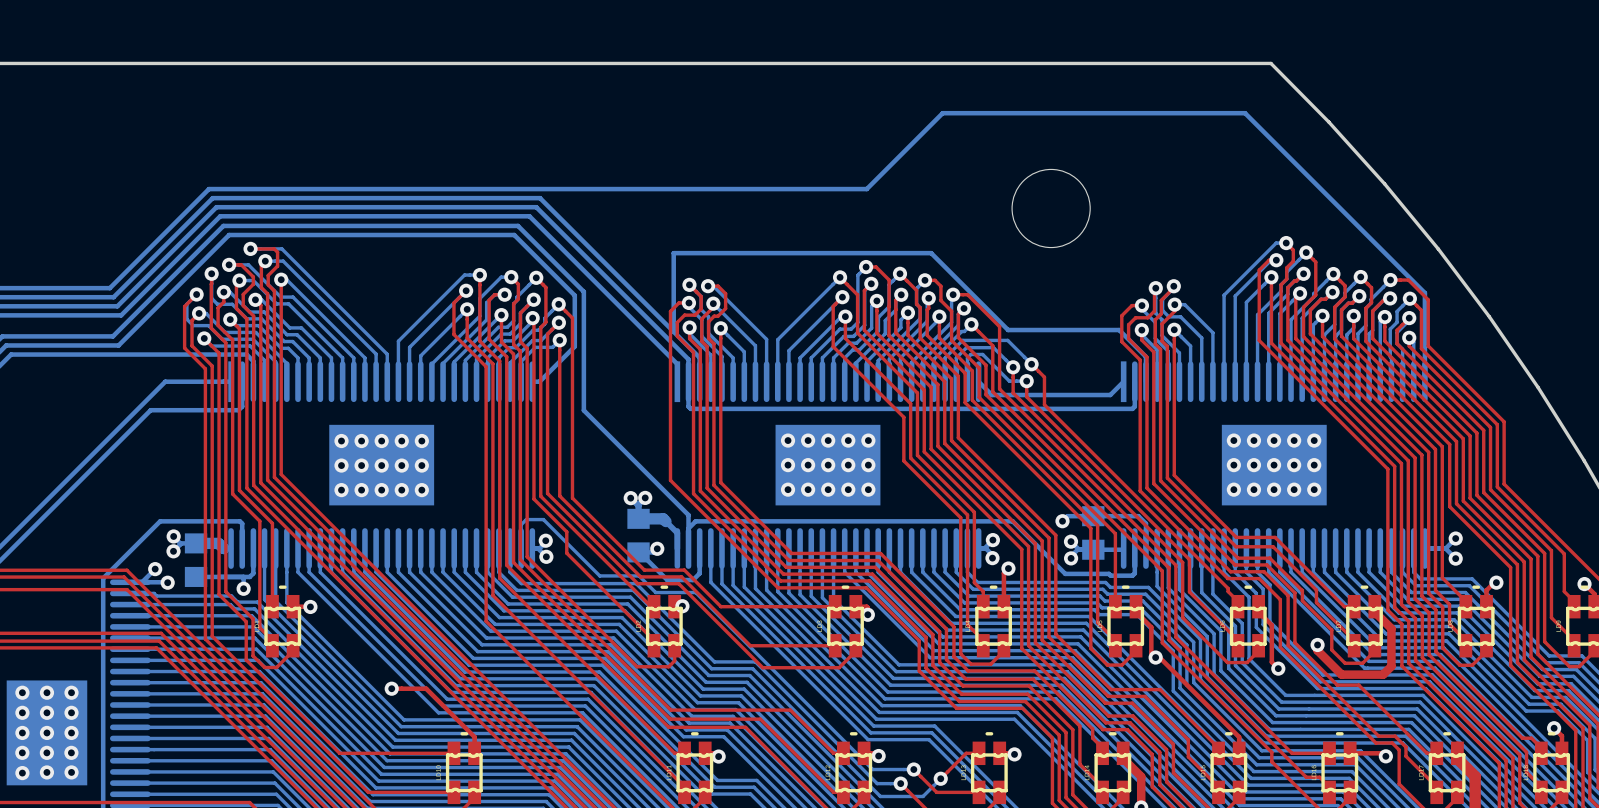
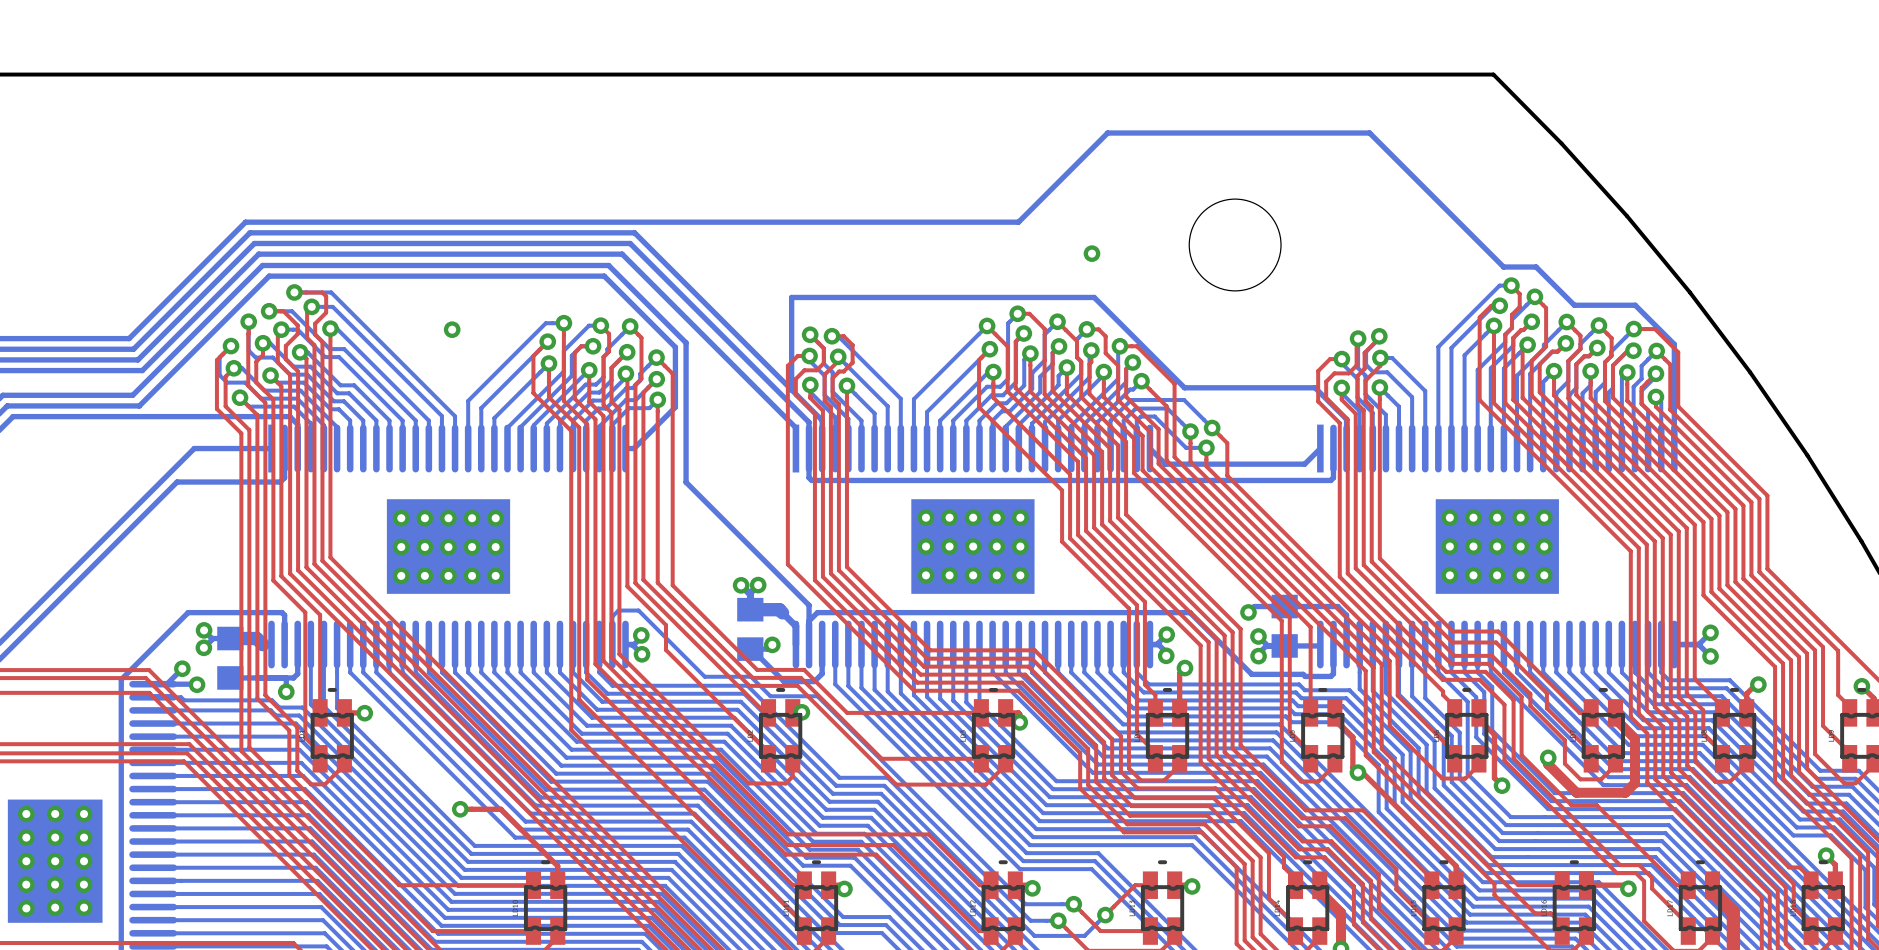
bottom track: (1165, 113) (1245, 113) (1391, 259) -> (1369, 133) (1503, 267) (1536, 267) (1574, 305) (1635, 305)
via: none -> (1091, 253)
via: none -> (452, 329)

